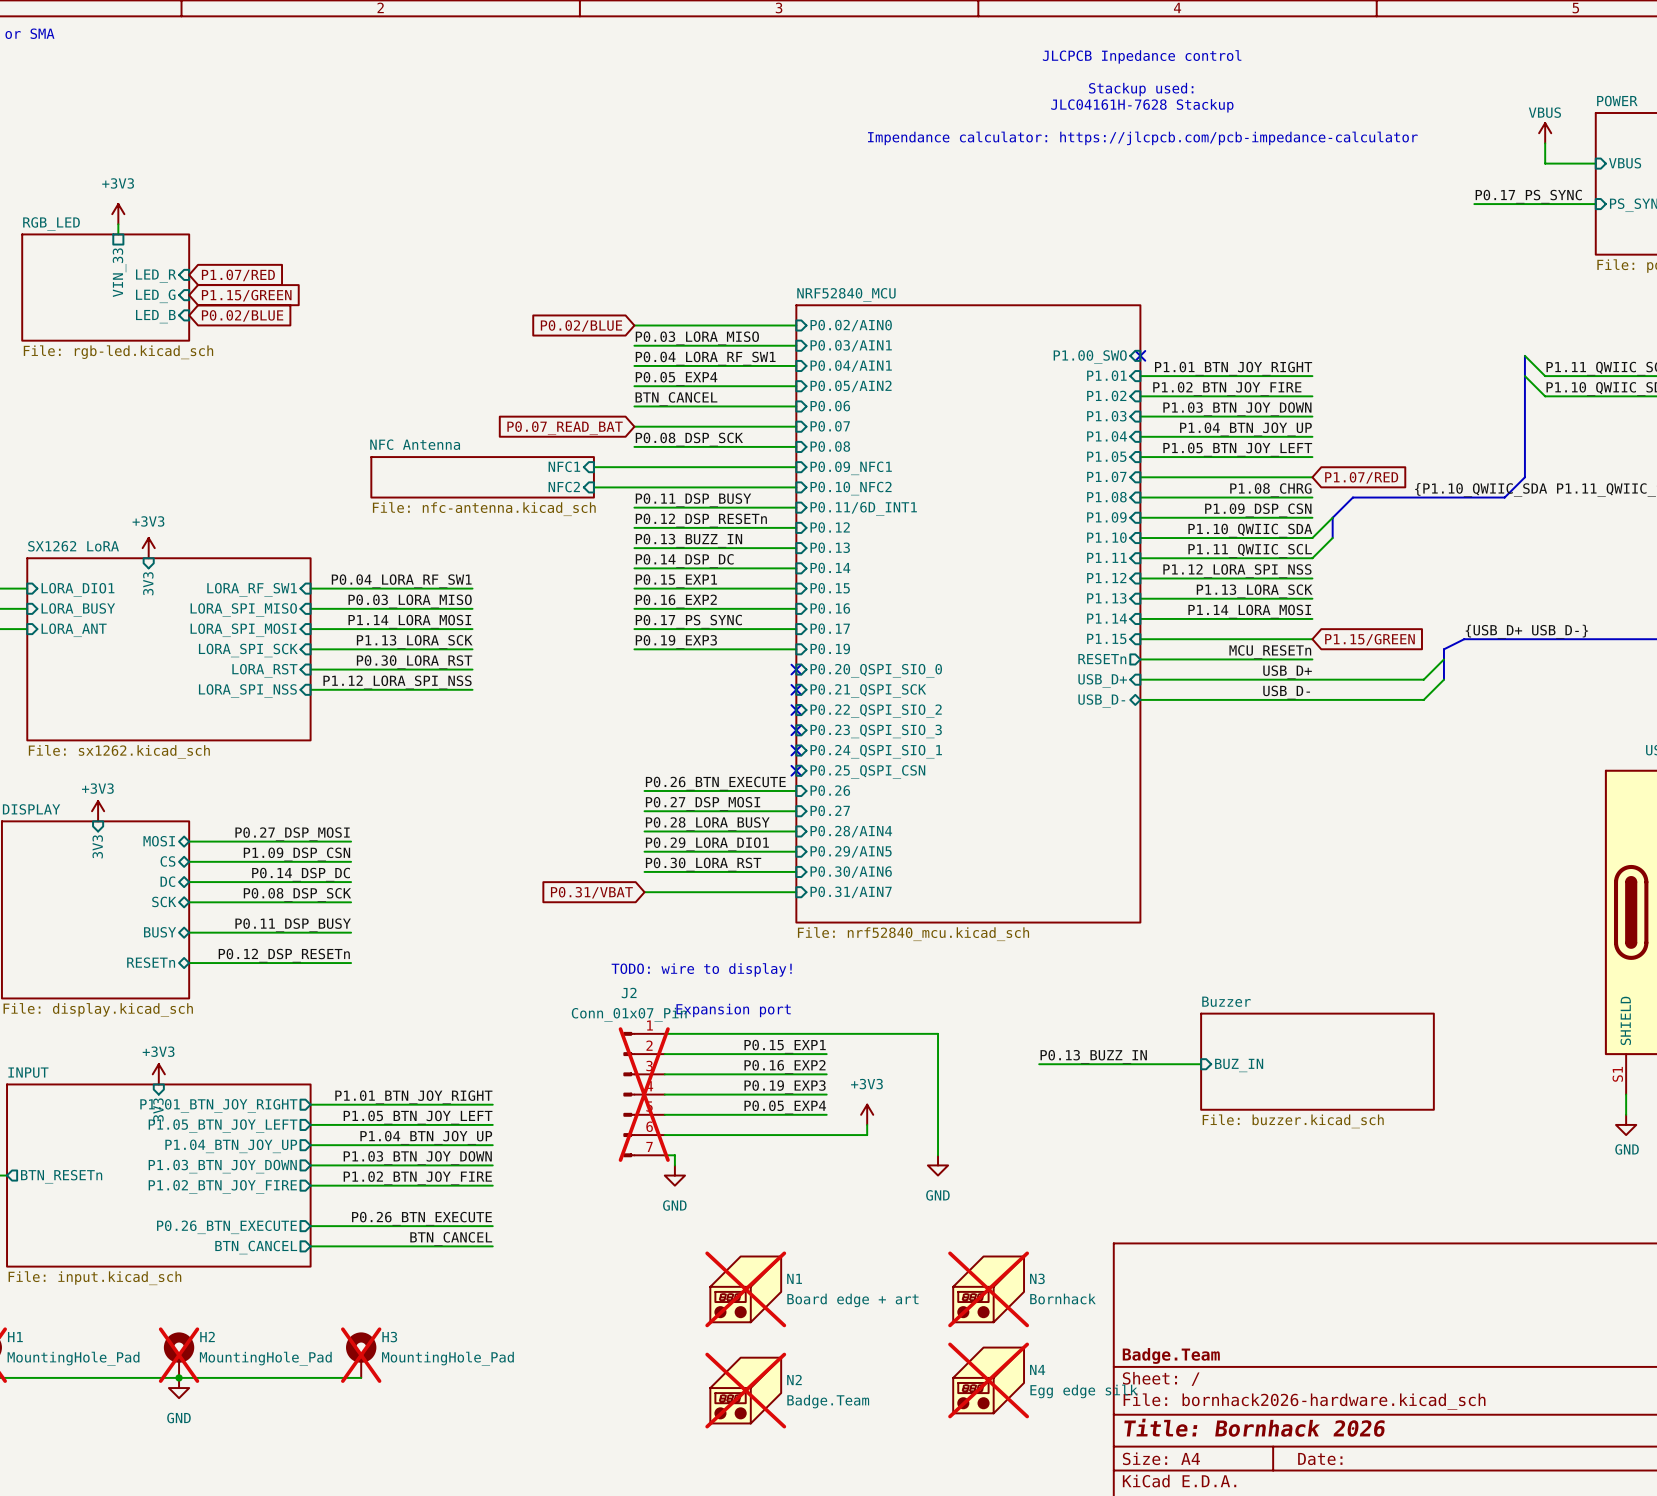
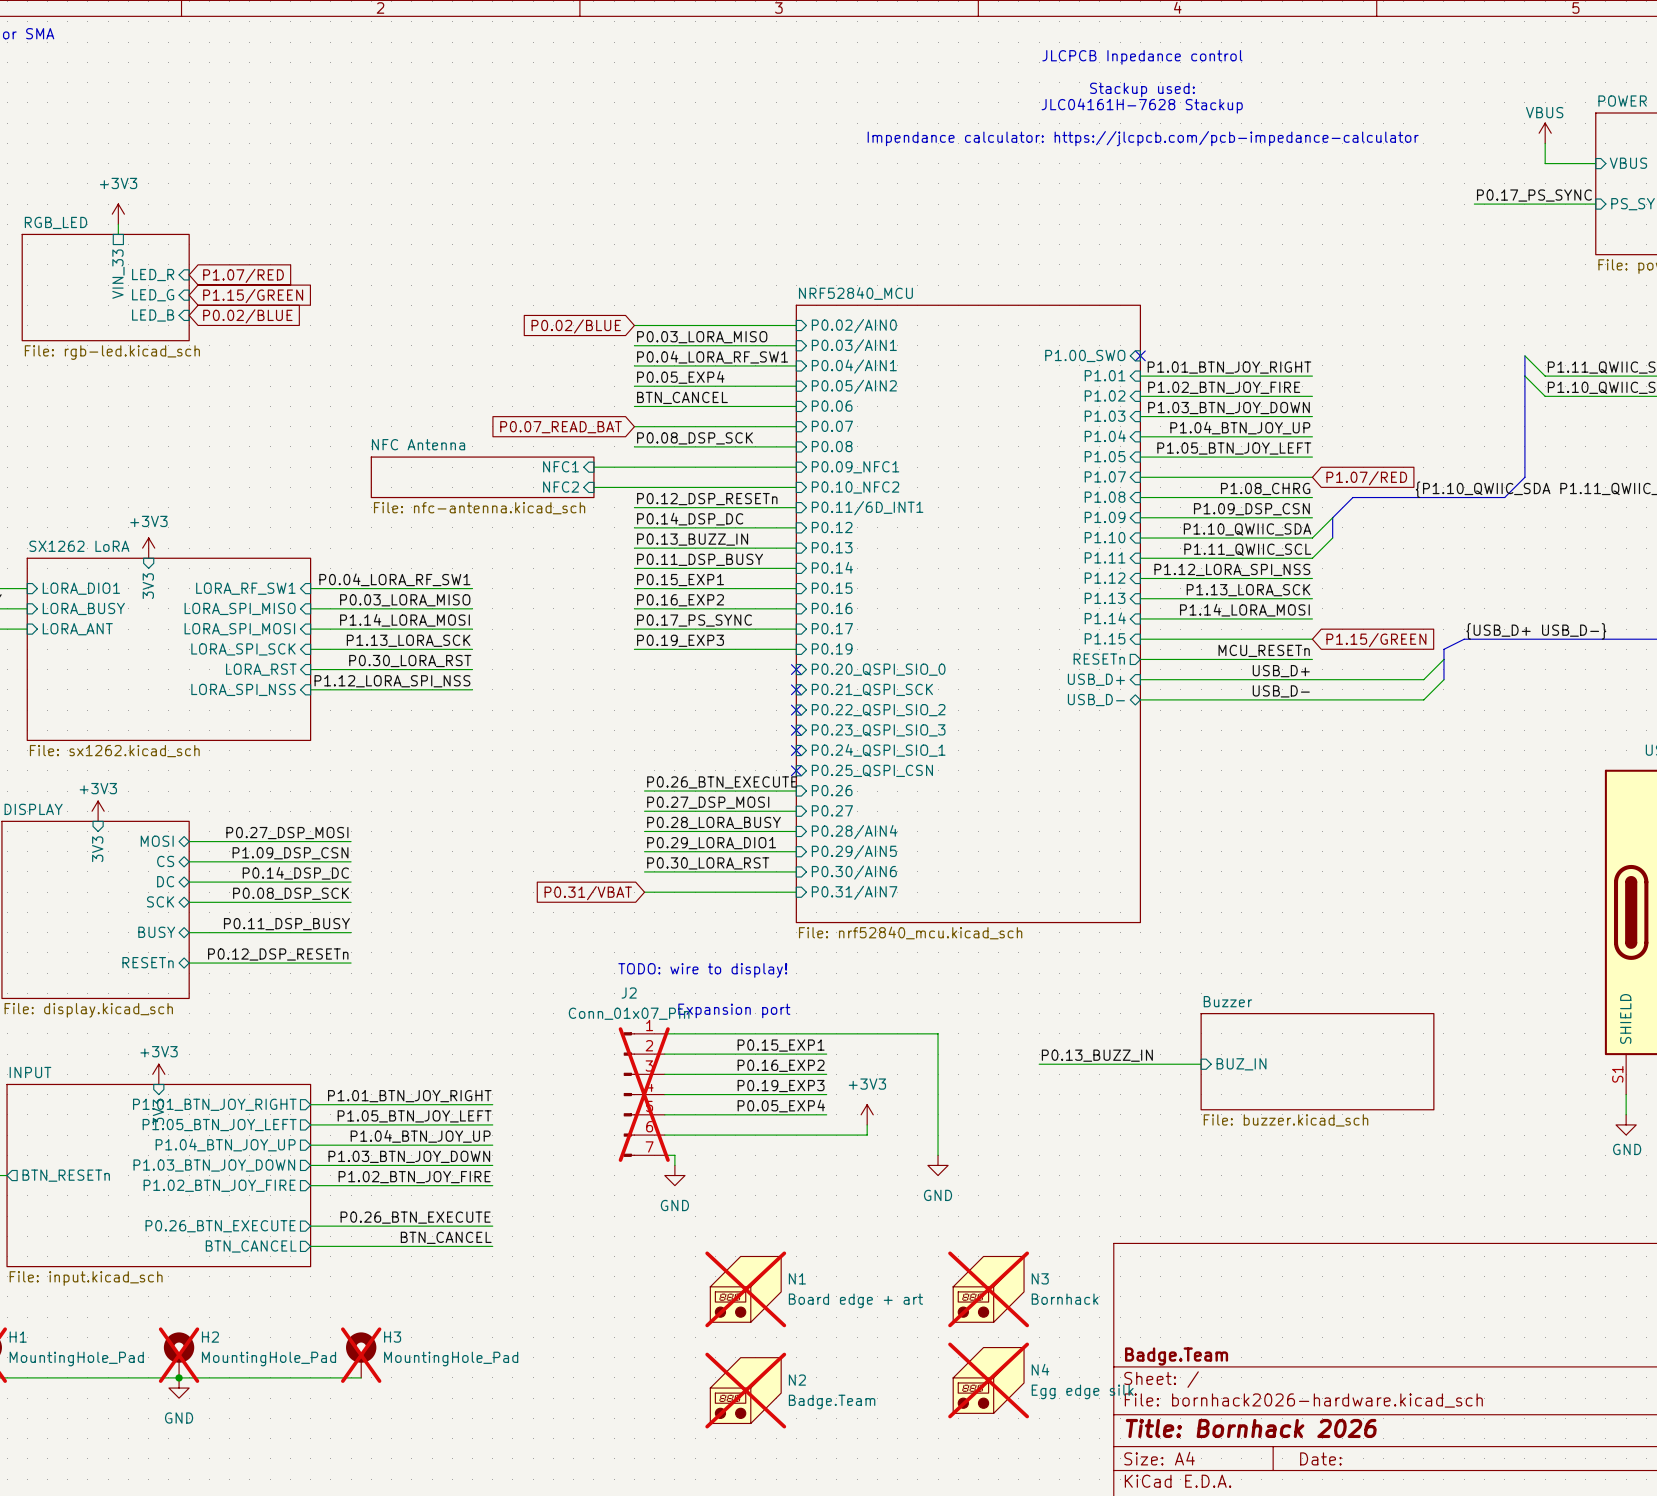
label: P0.11_DSP_BUSY (693, 500) -> P0.12_DSP_RESETn (707, 499)
label: P0.12_DSP_RESETn (701, 520) -> P0.14_DSP_DC (690, 519)
label: P0.14_DSP_DC (684, 560) -> P0.11_DSP_BUSY (700, 559)

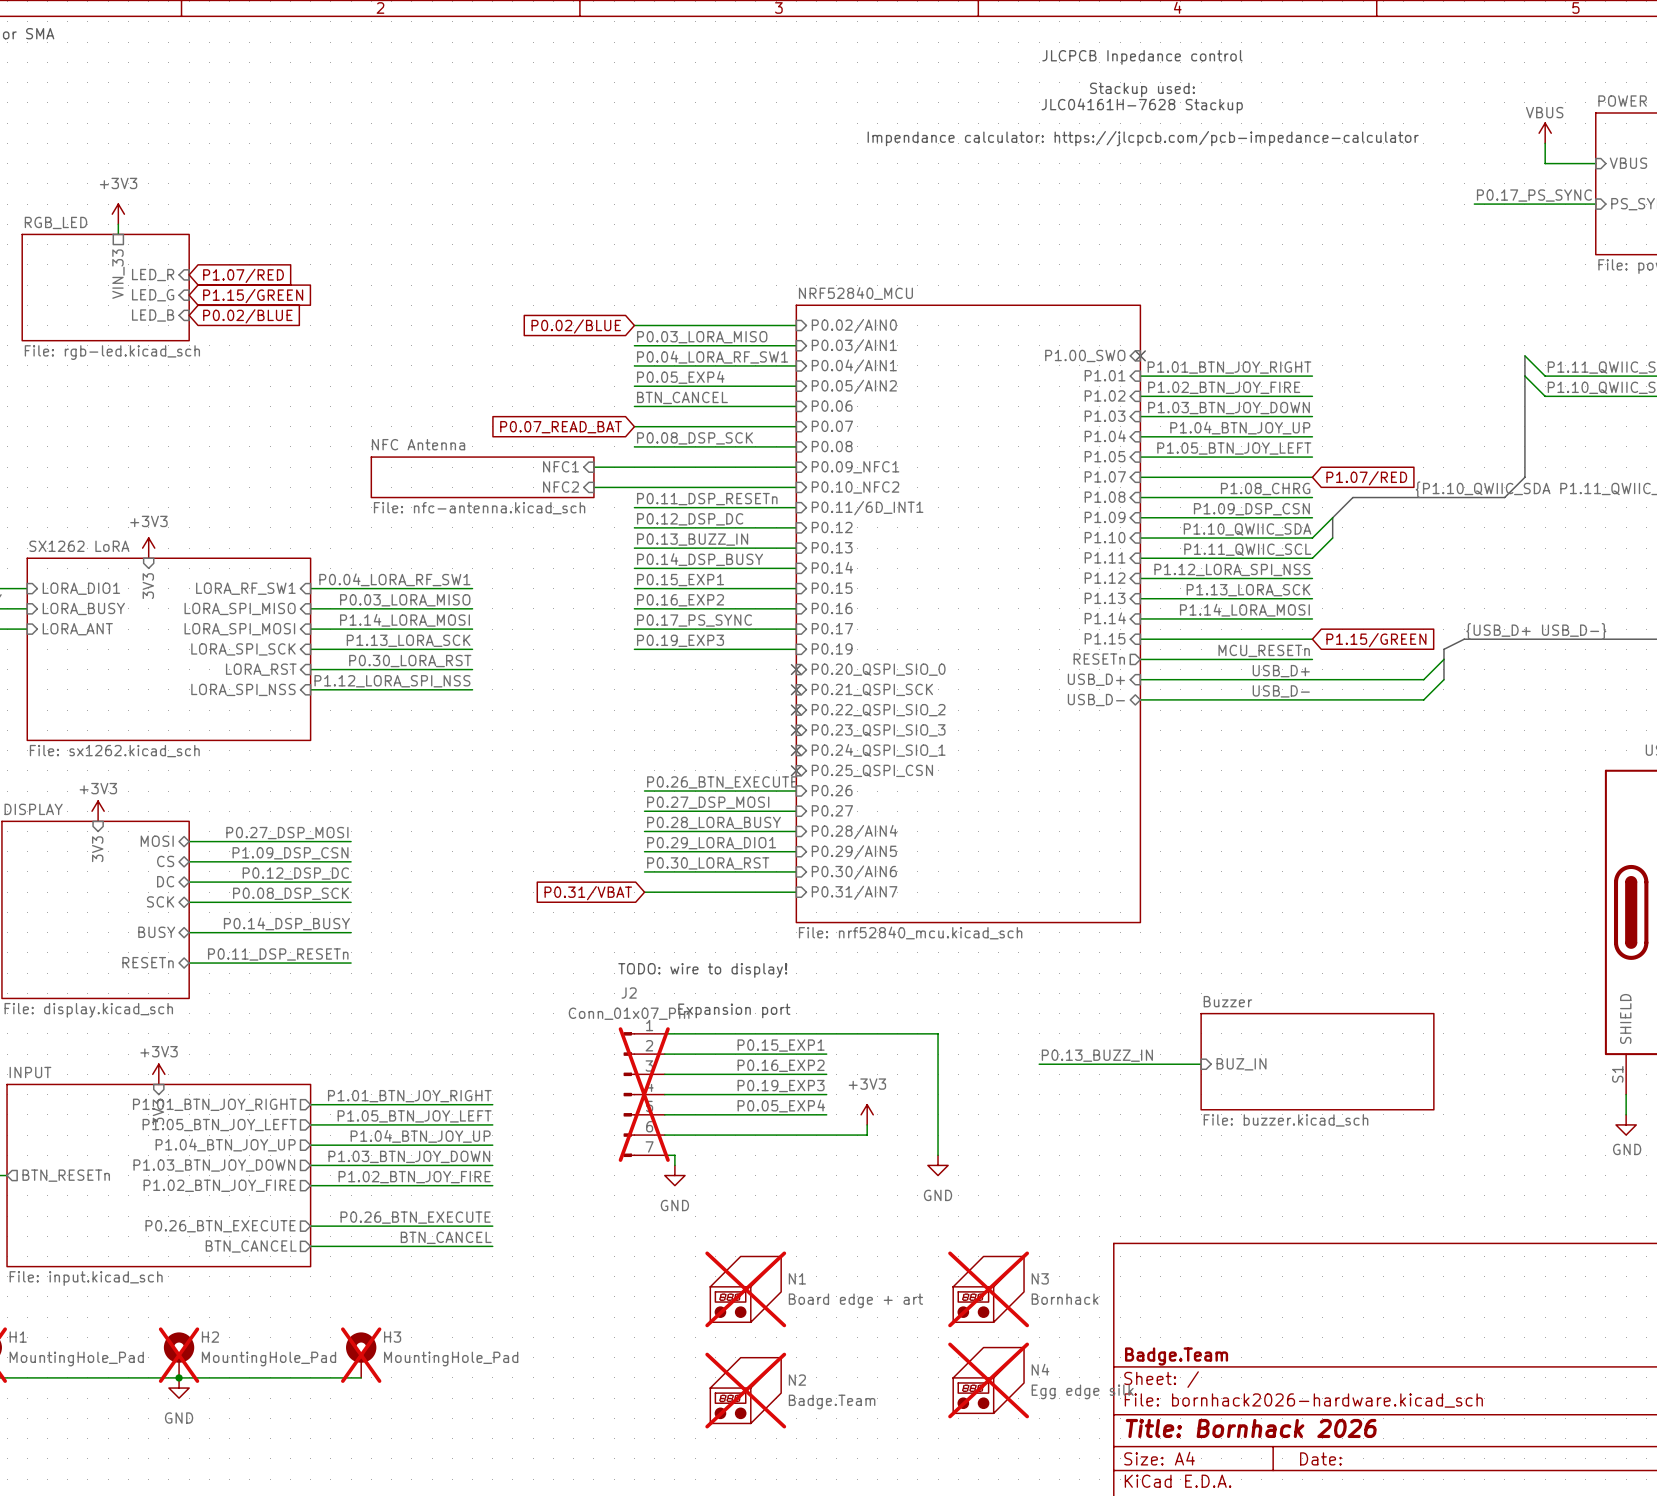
label: P0.12_DSP_RESETn (707, 499) -> P0.11_DSP_RESETn (707, 499)
label: P0.14_DSP_DC (690, 519) -> P0.12_DSP_DC (690, 519)
label: P0.11_DSP_BUSY (700, 559) -> P0.14_DSP_BUSY (700, 559)
label: P0.14_DSP_DC (295, 873) -> P0.12_DSP_DC (295, 873)
label: P0.11_DSP_BUSY (286, 924) -> P0.14_DSP_BUSY (286, 923)
label: P0.12_DSP_RESETn (278, 954) -> P0.11_DSP_RESETn (278, 954)

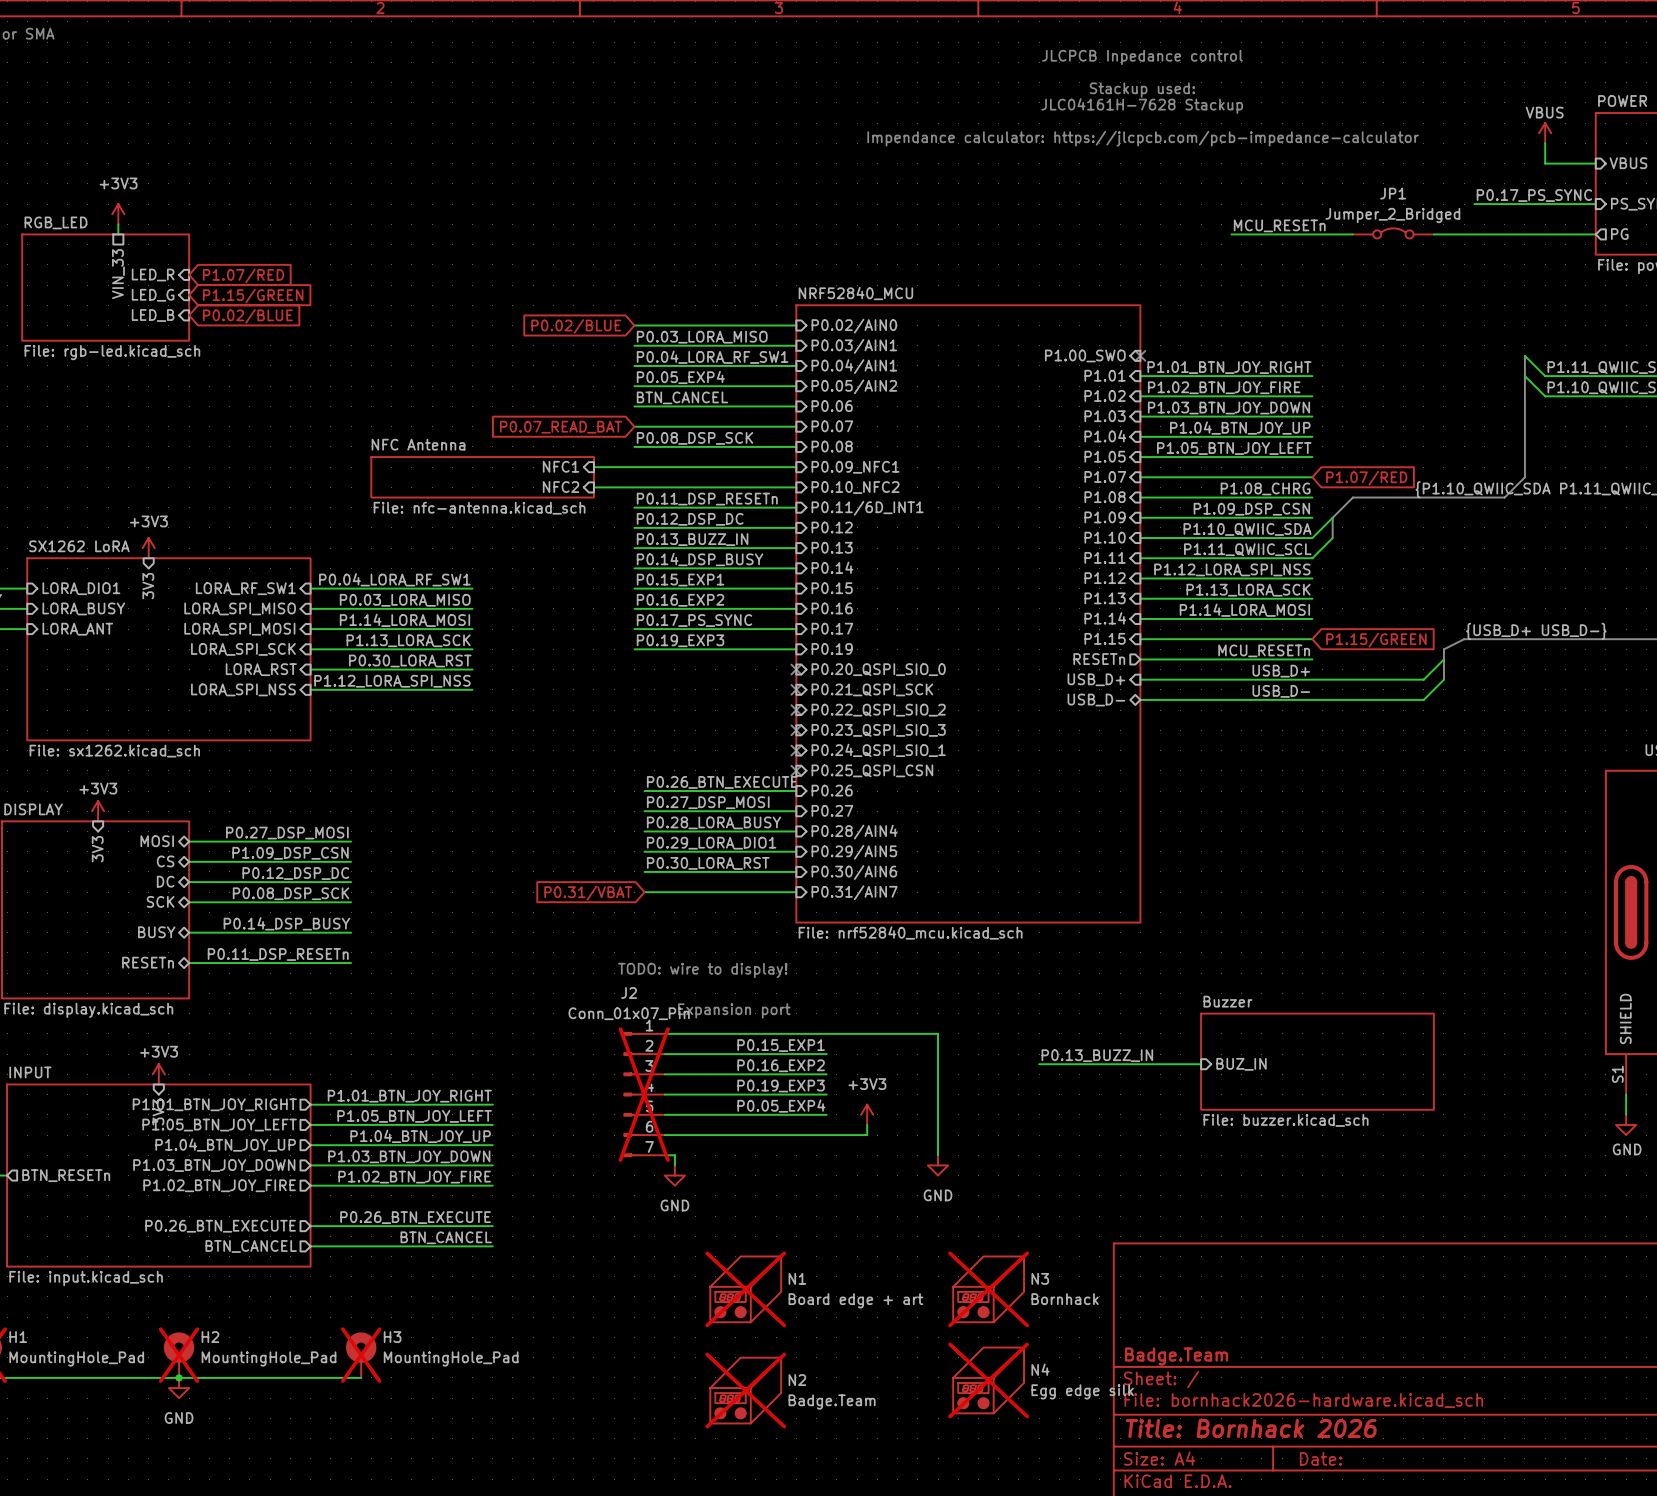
label: none -> MCU_RESETn (1279, 225)
JP1: none -> Jumper_2_Bridged (1393, 233)
wire: none -> (1231, 234) (1352, 234)
wire: none -> (1433, 234) (1595, 234)
sheet pin: none -> PG (1619, 234)

